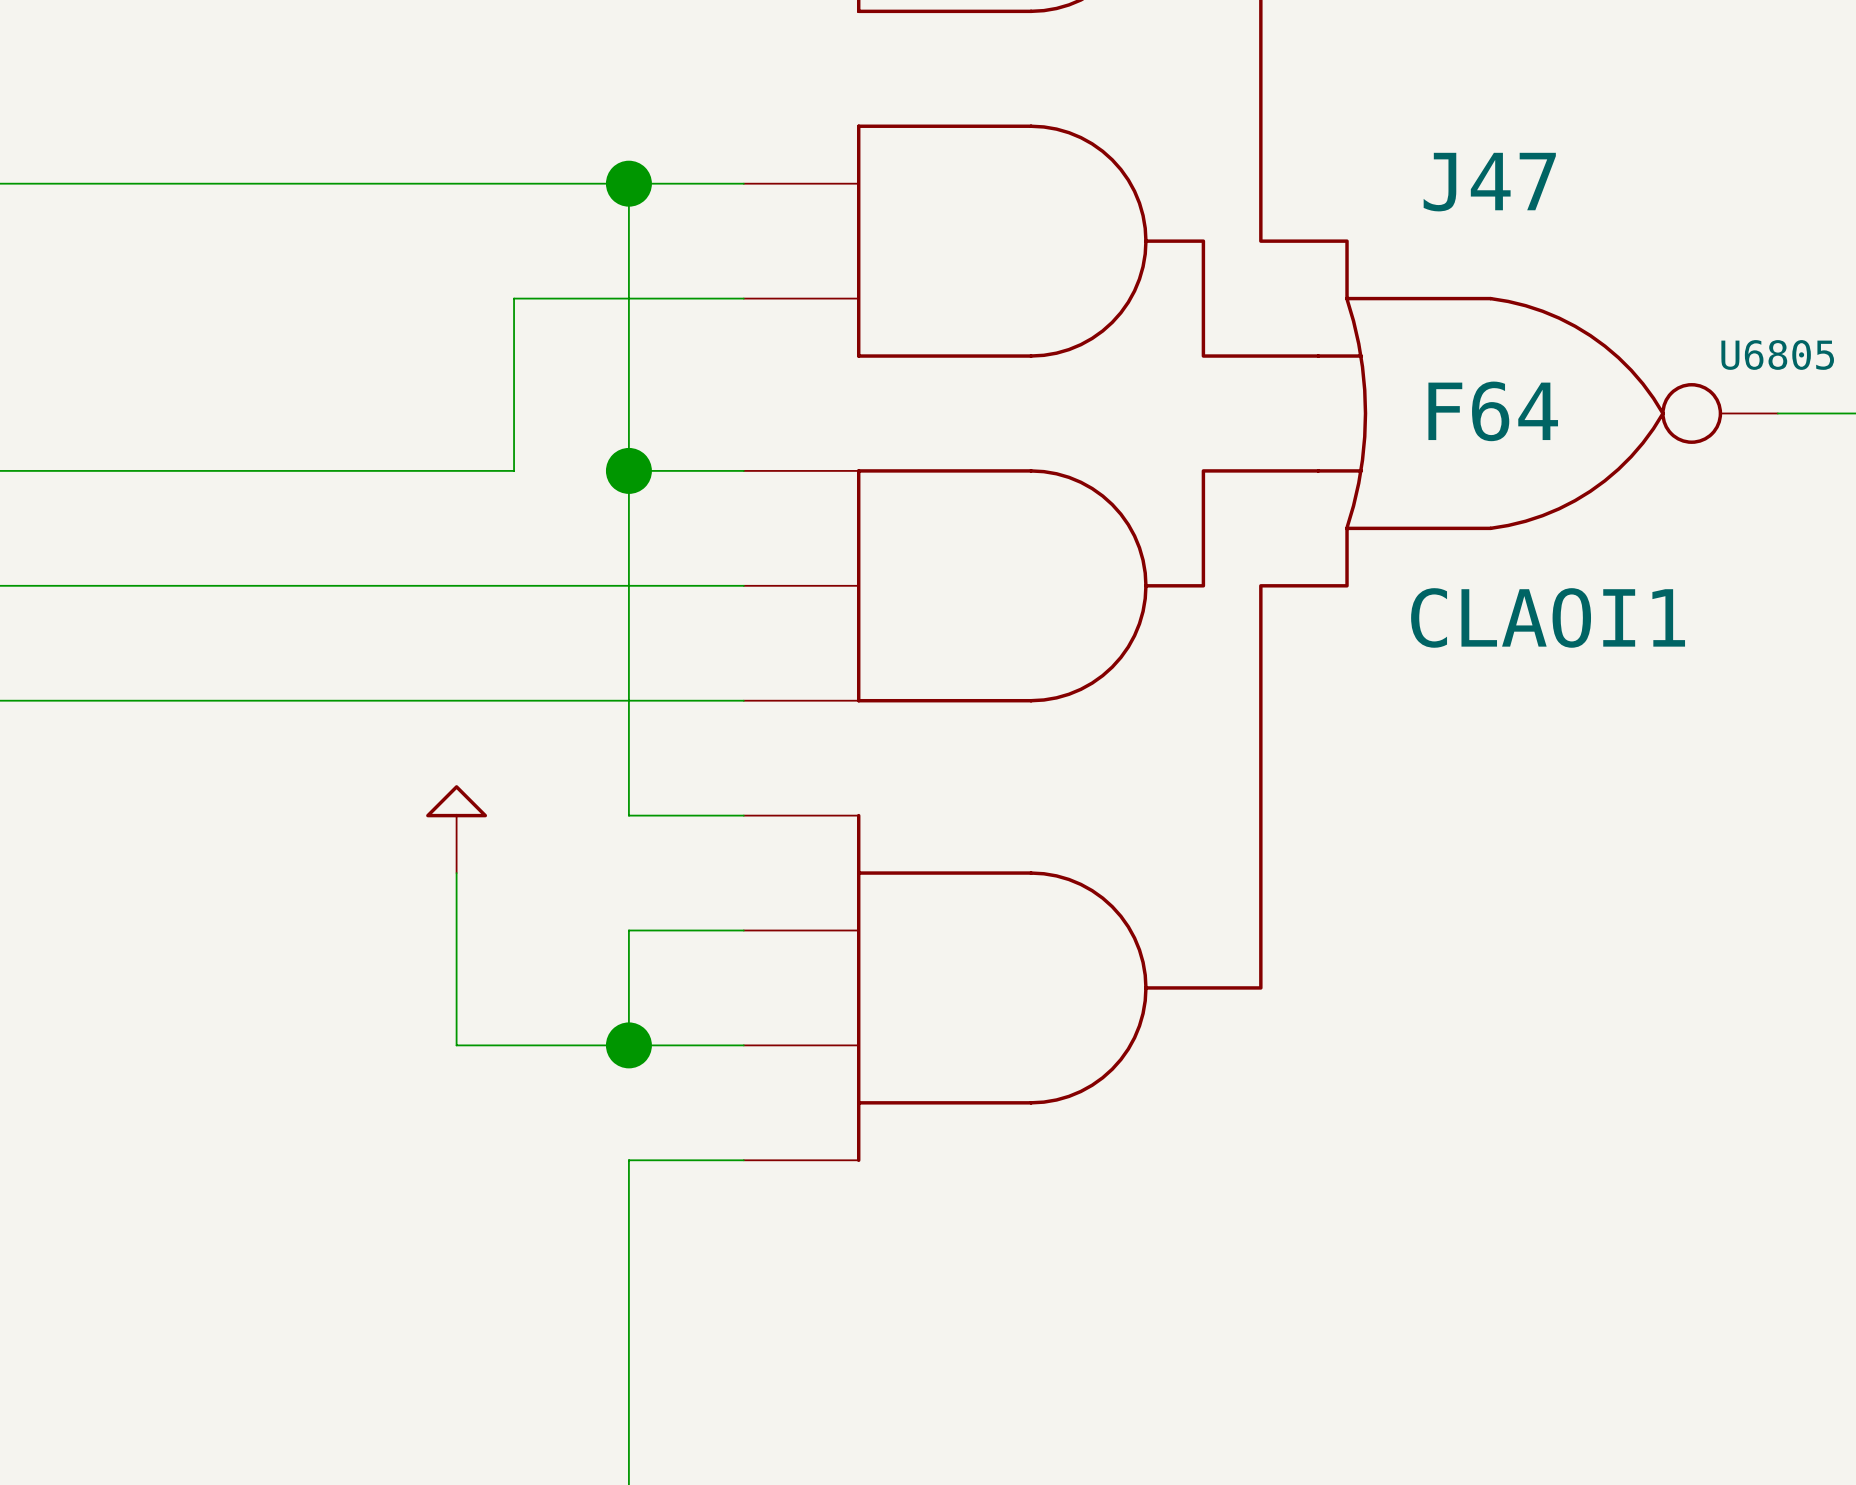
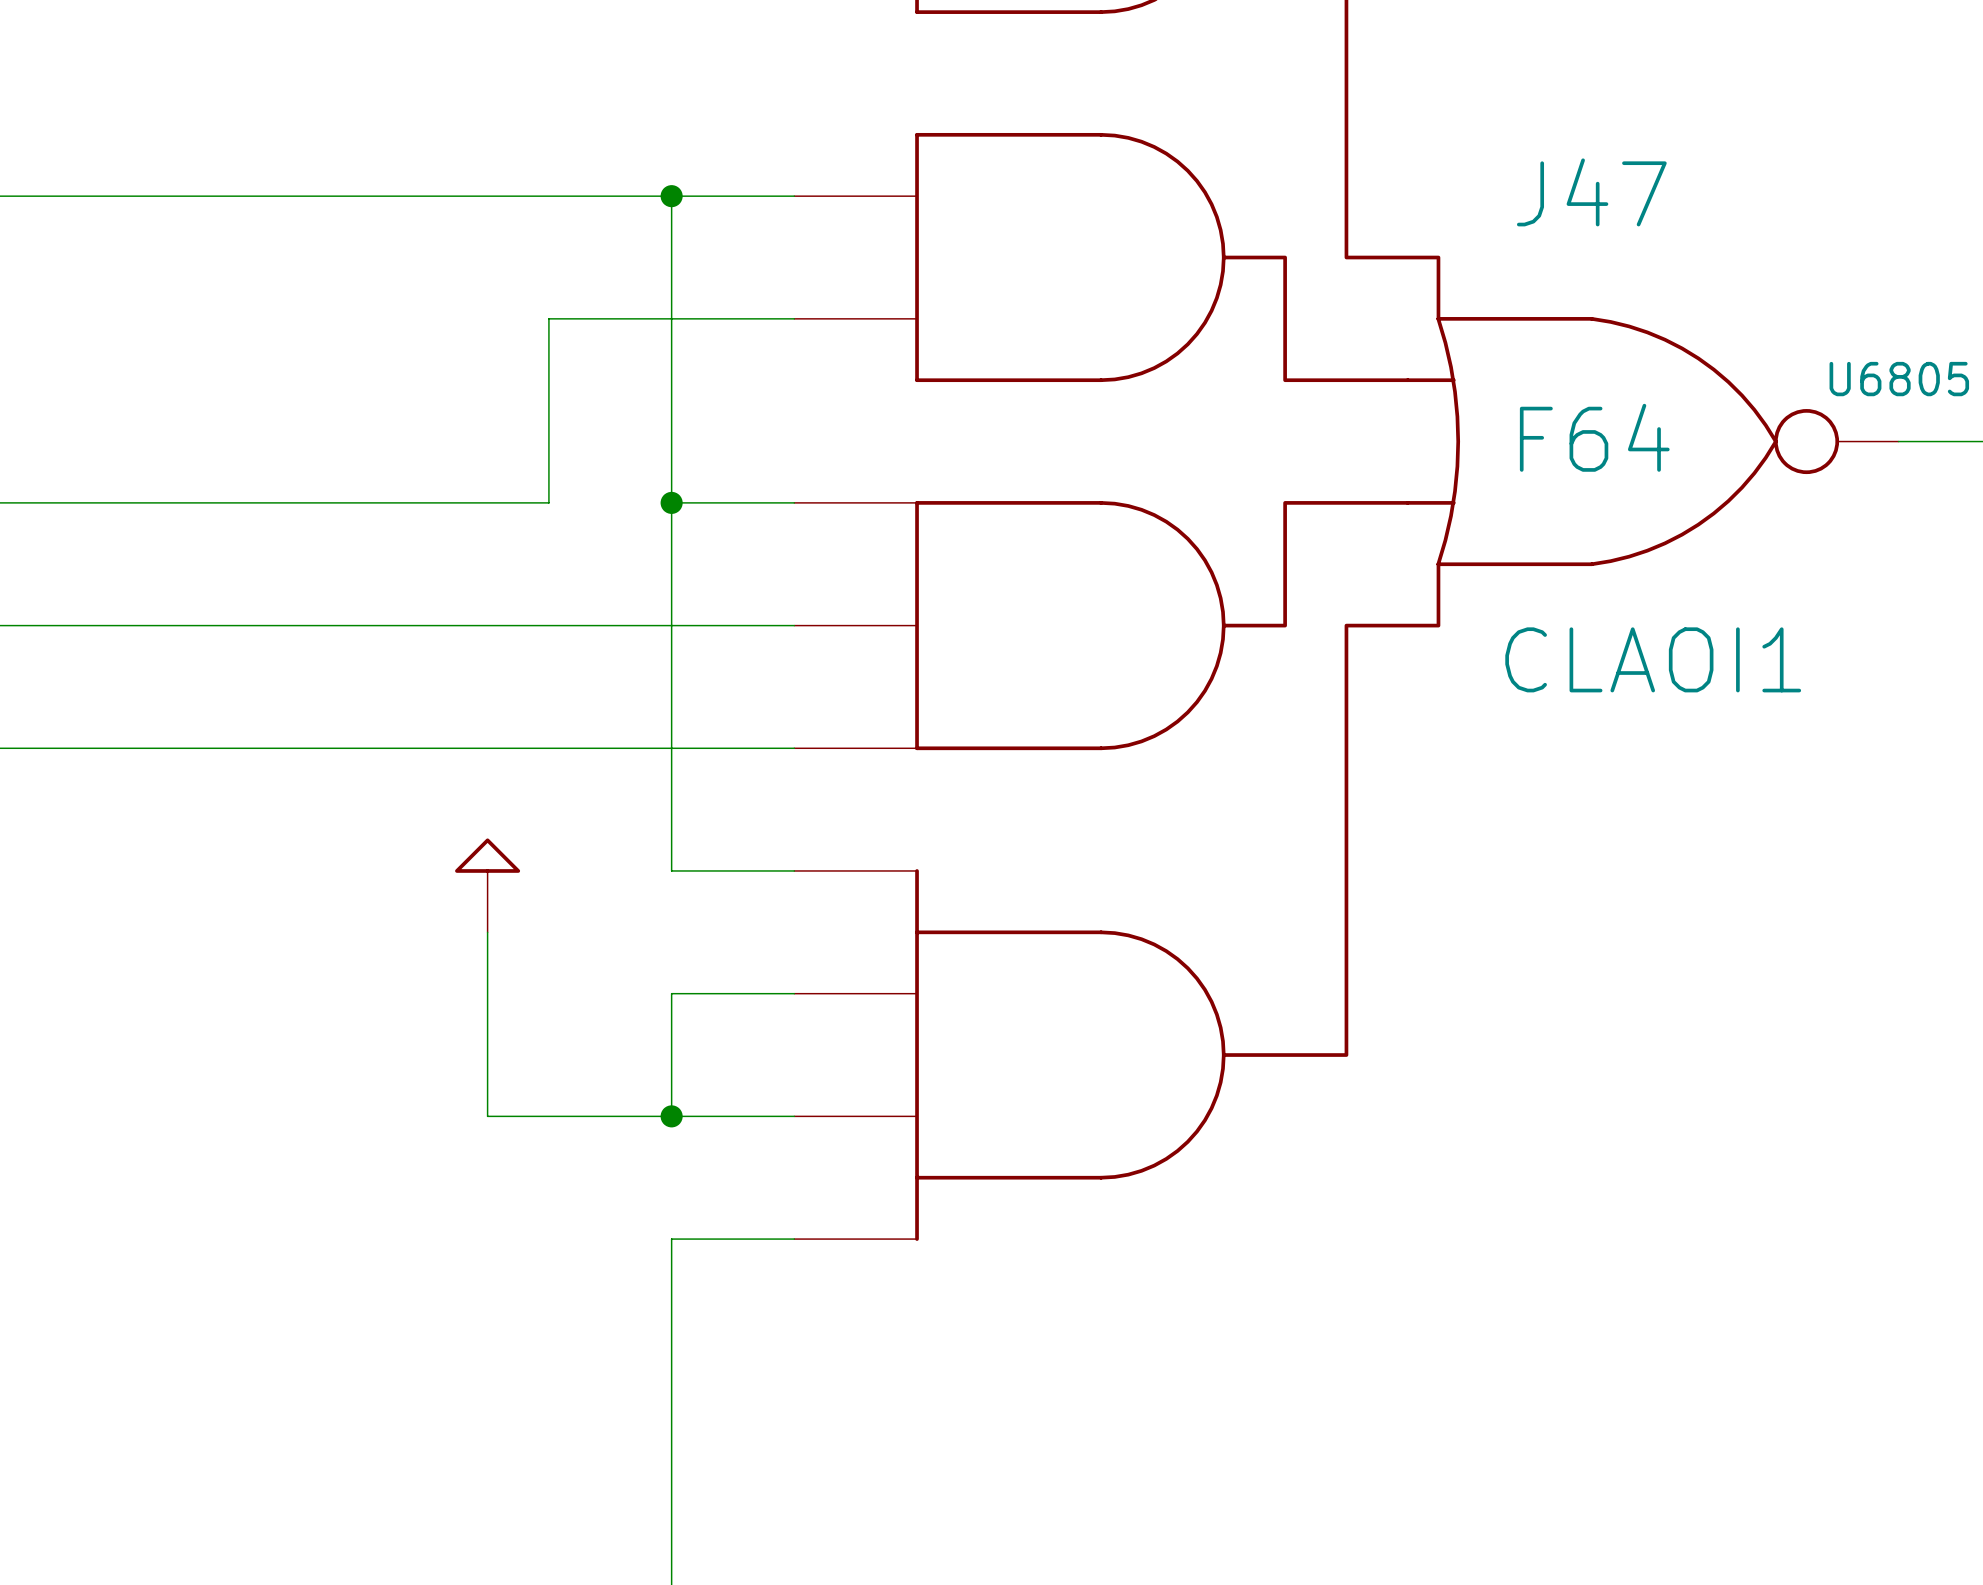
junction size: [605, 160, 652, 207] -> [660, 185, 683, 208]
junction size: [605, 447, 652, 494] -> [660, 491, 683, 514]
junction size: [605, 1022, 652, 1069] -> [660, 1105, 683, 1128]

